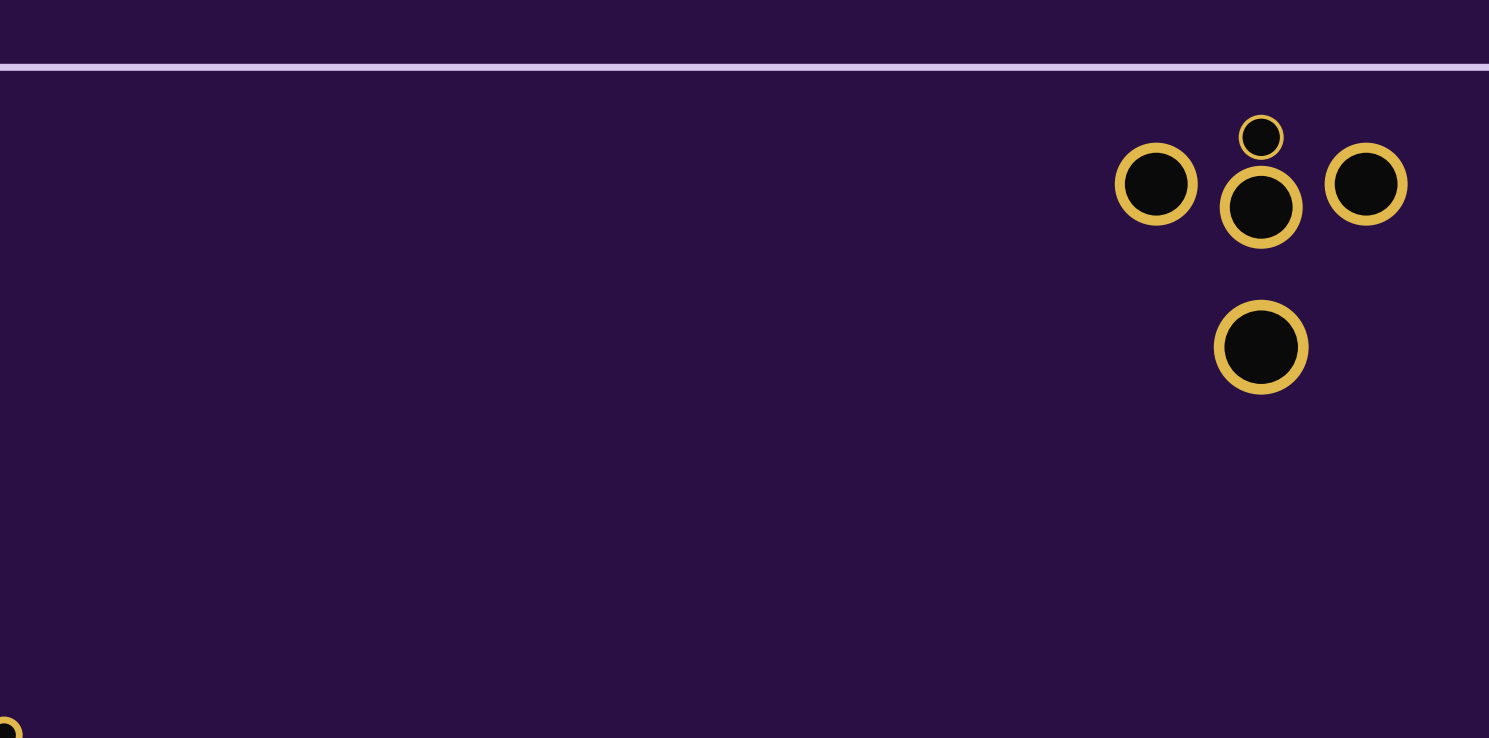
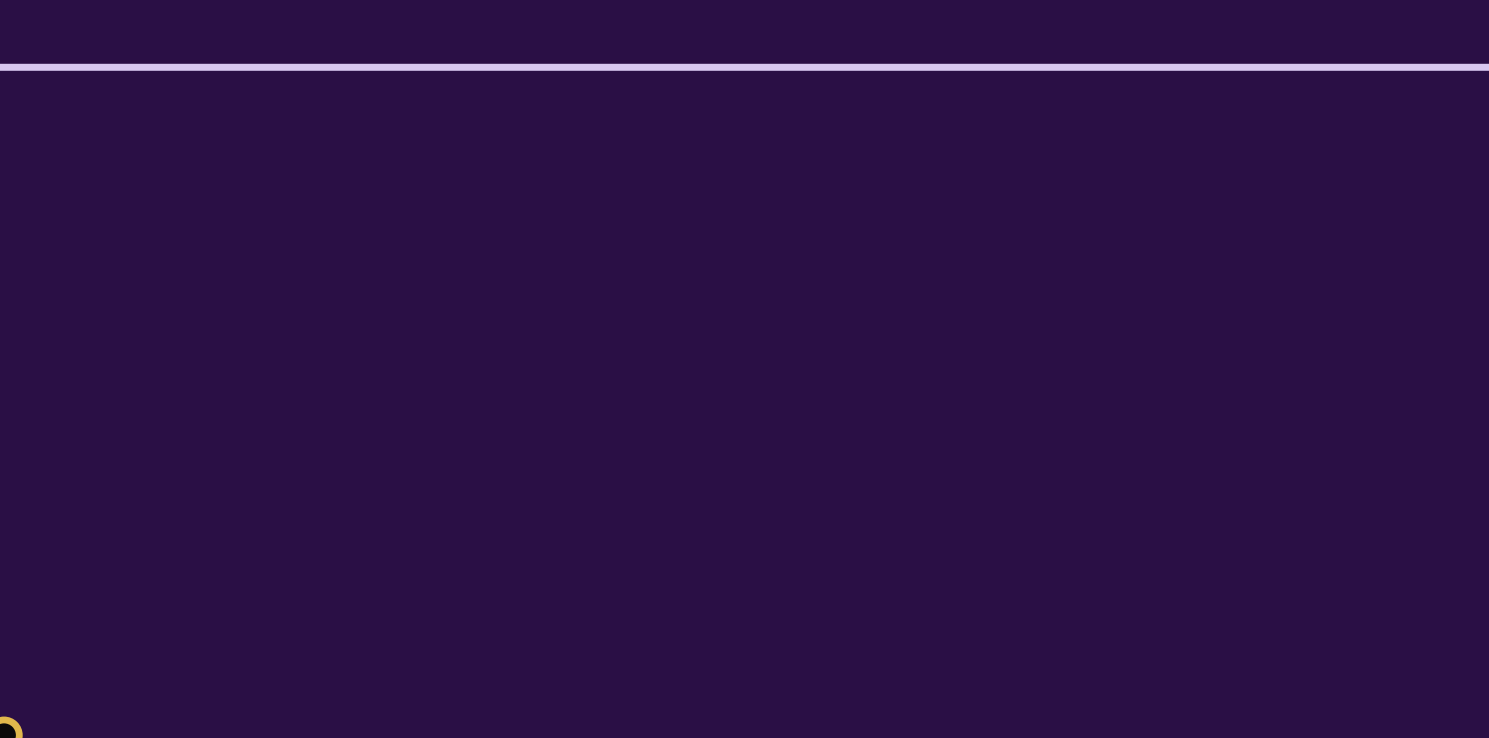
part: (1261, 254) -> none

